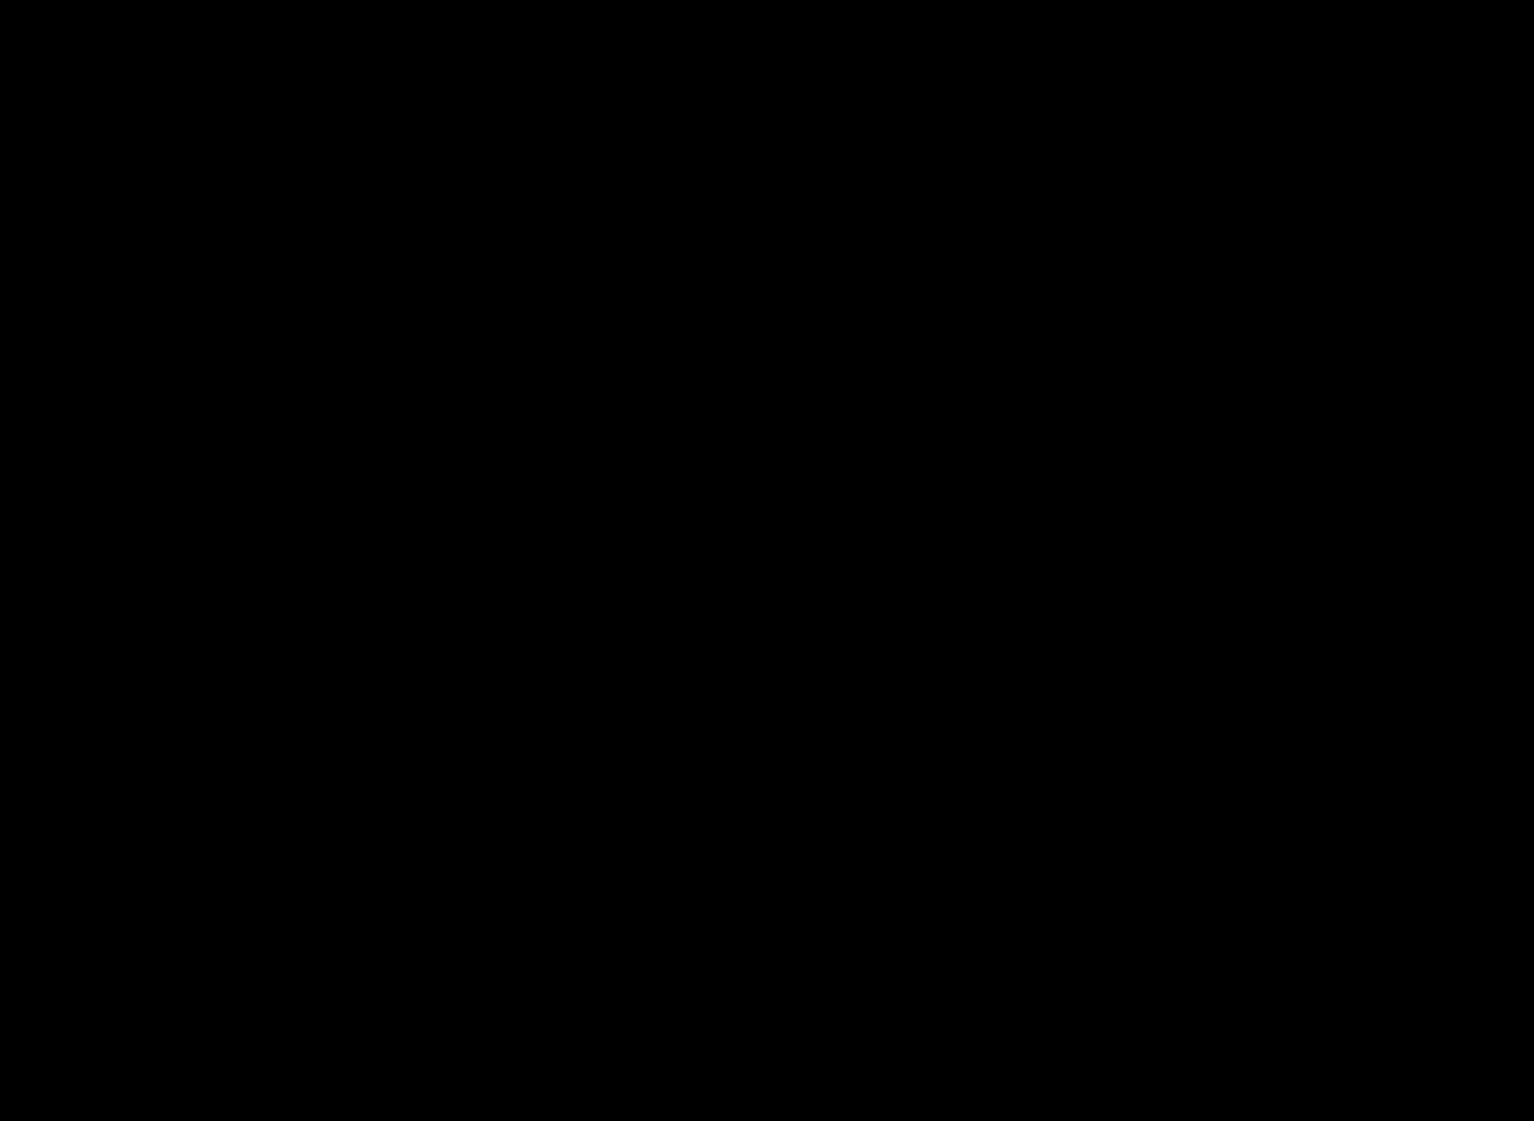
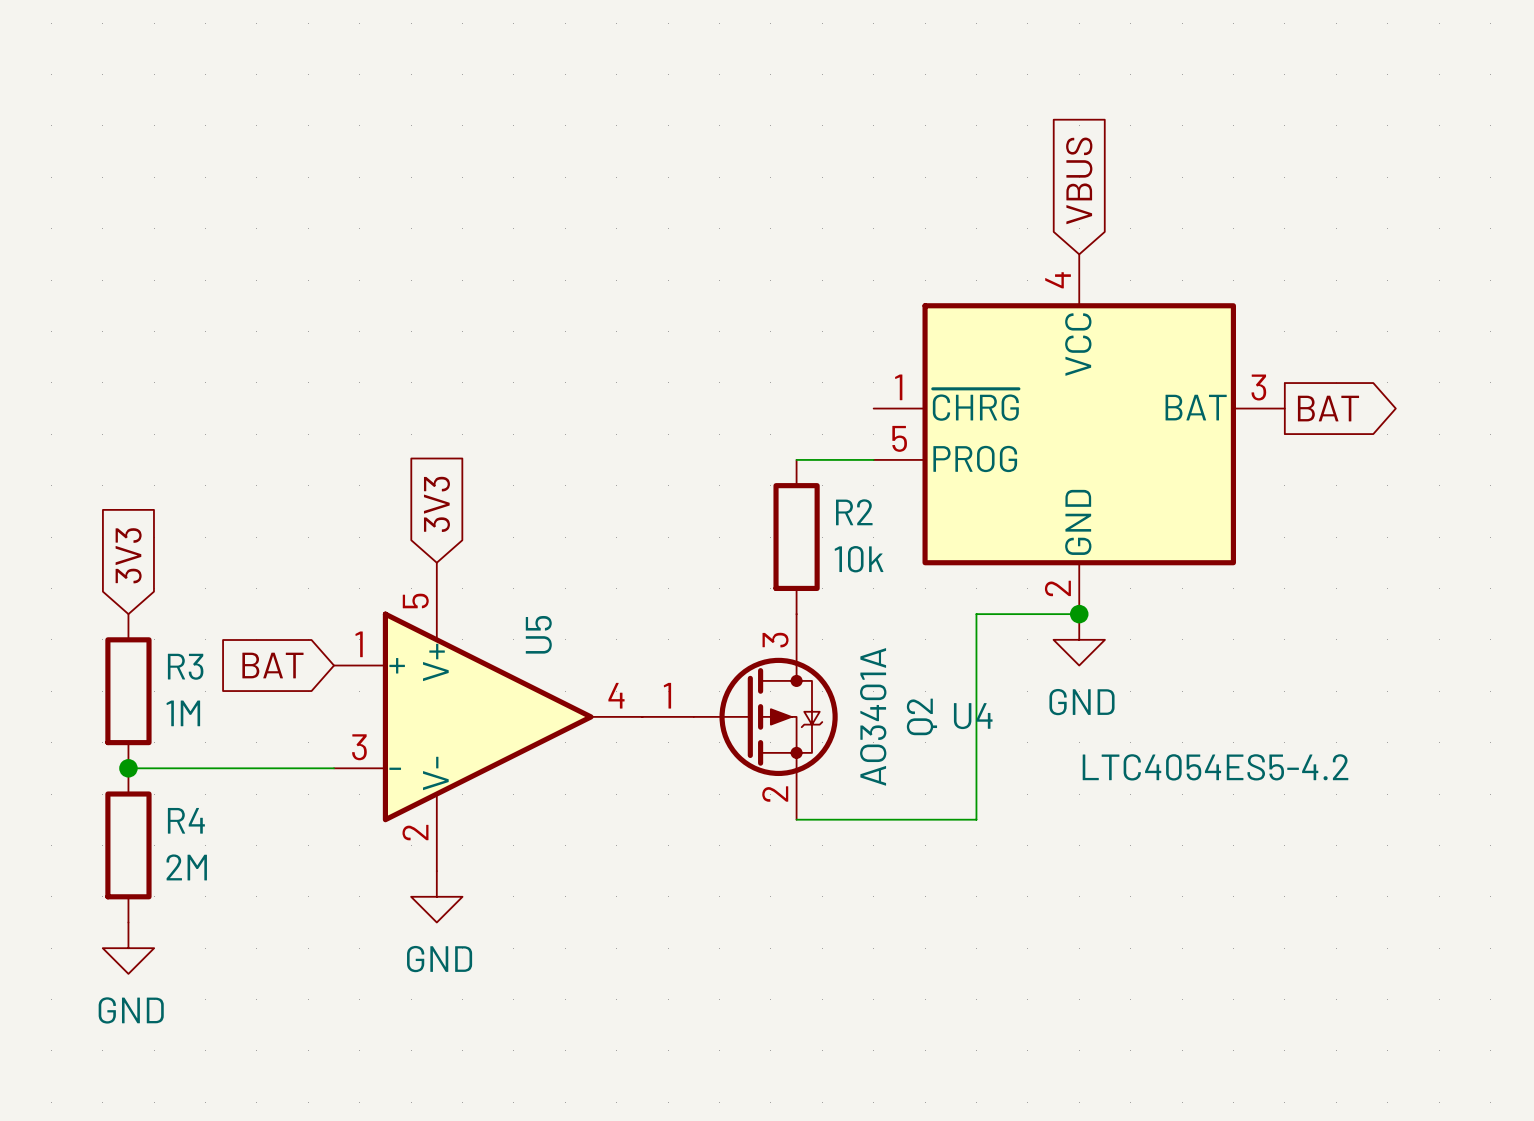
global label: none -> VBUS (1079, 180)
global label: none -> BAT (1328, 408)
U4: none -> LTC4054ES5-4.2 (1079, 434)
wire: none -> (796, 459) (873, 459)
global label: none -> 3V3 (436, 504)
R2: none -> 10k (796, 537)
global label: none -> 3V3 (128, 555)
wire: none -> (1079, 614) (976, 614) (976, 819) (796, 819)
junction: none -> (1079, 614)
power symbol: none -> GND (1079, 639)
global label: none -> BAT (272, 665)
R3: none -> 1M (128, 691)
U5: none -> (488, 716)
Q2: none -> AO3401A (740, 716)
wire: none -> (128, 768) (334, 768)
junction: none -> (128, 768)
R4: none -> 2M (128, 845)
power symbol: none -> GND (436, 896)
power symbol: none -> GND (128, 948)

